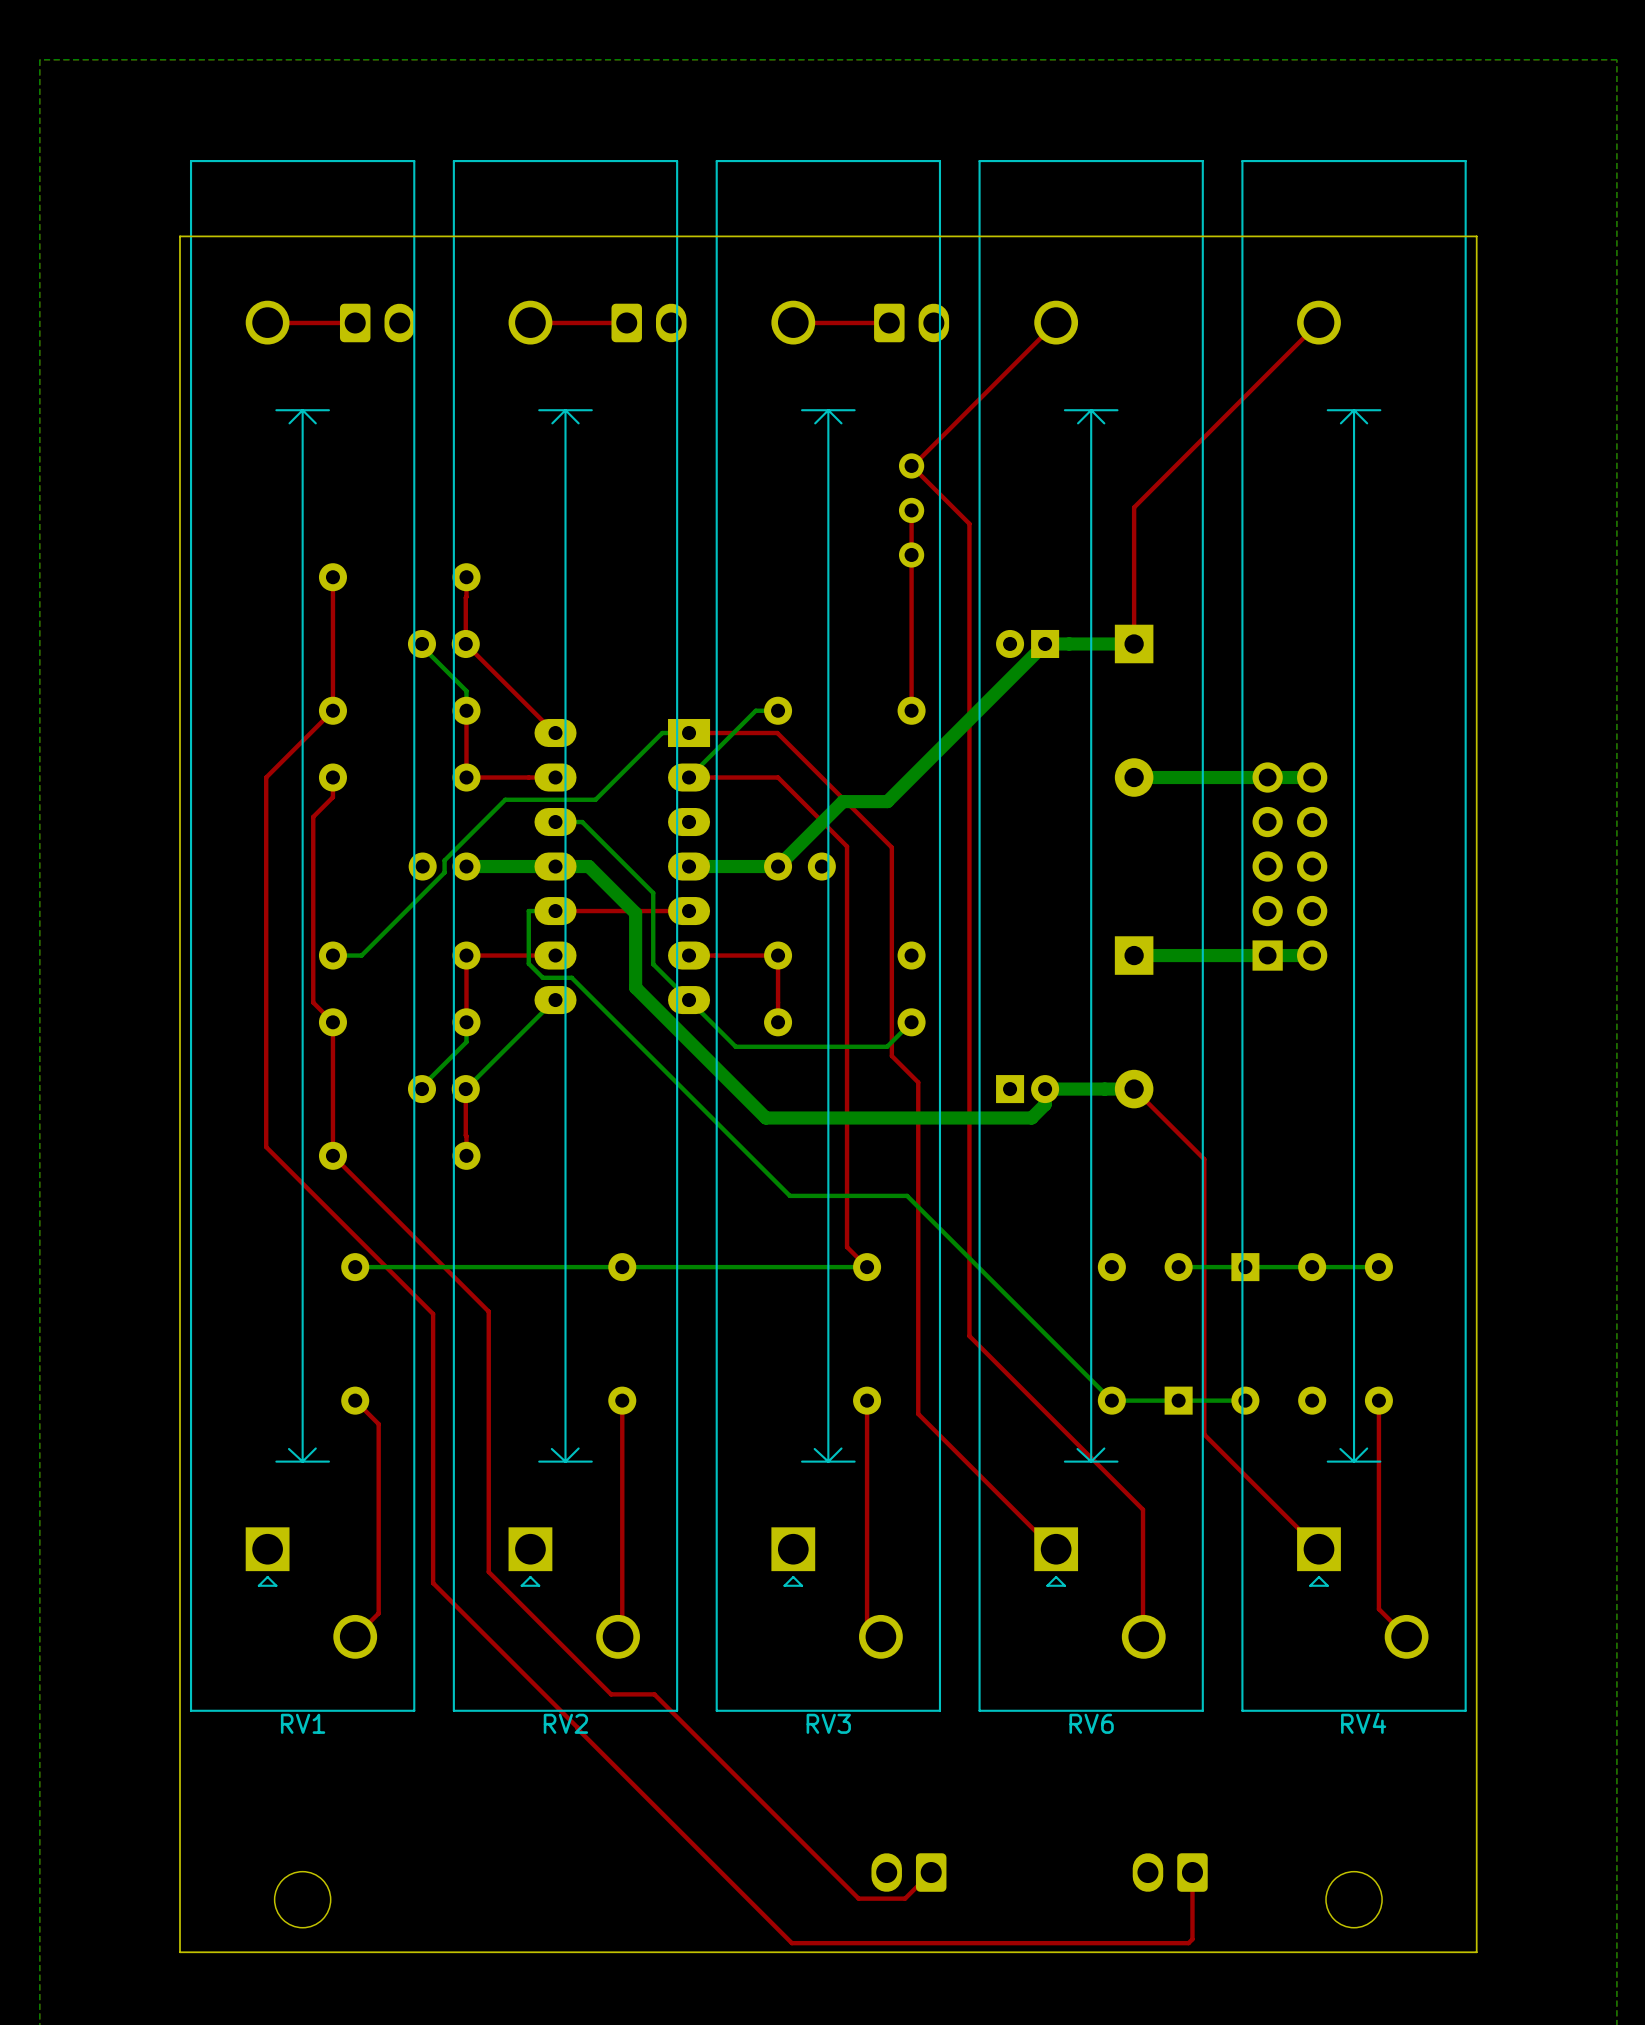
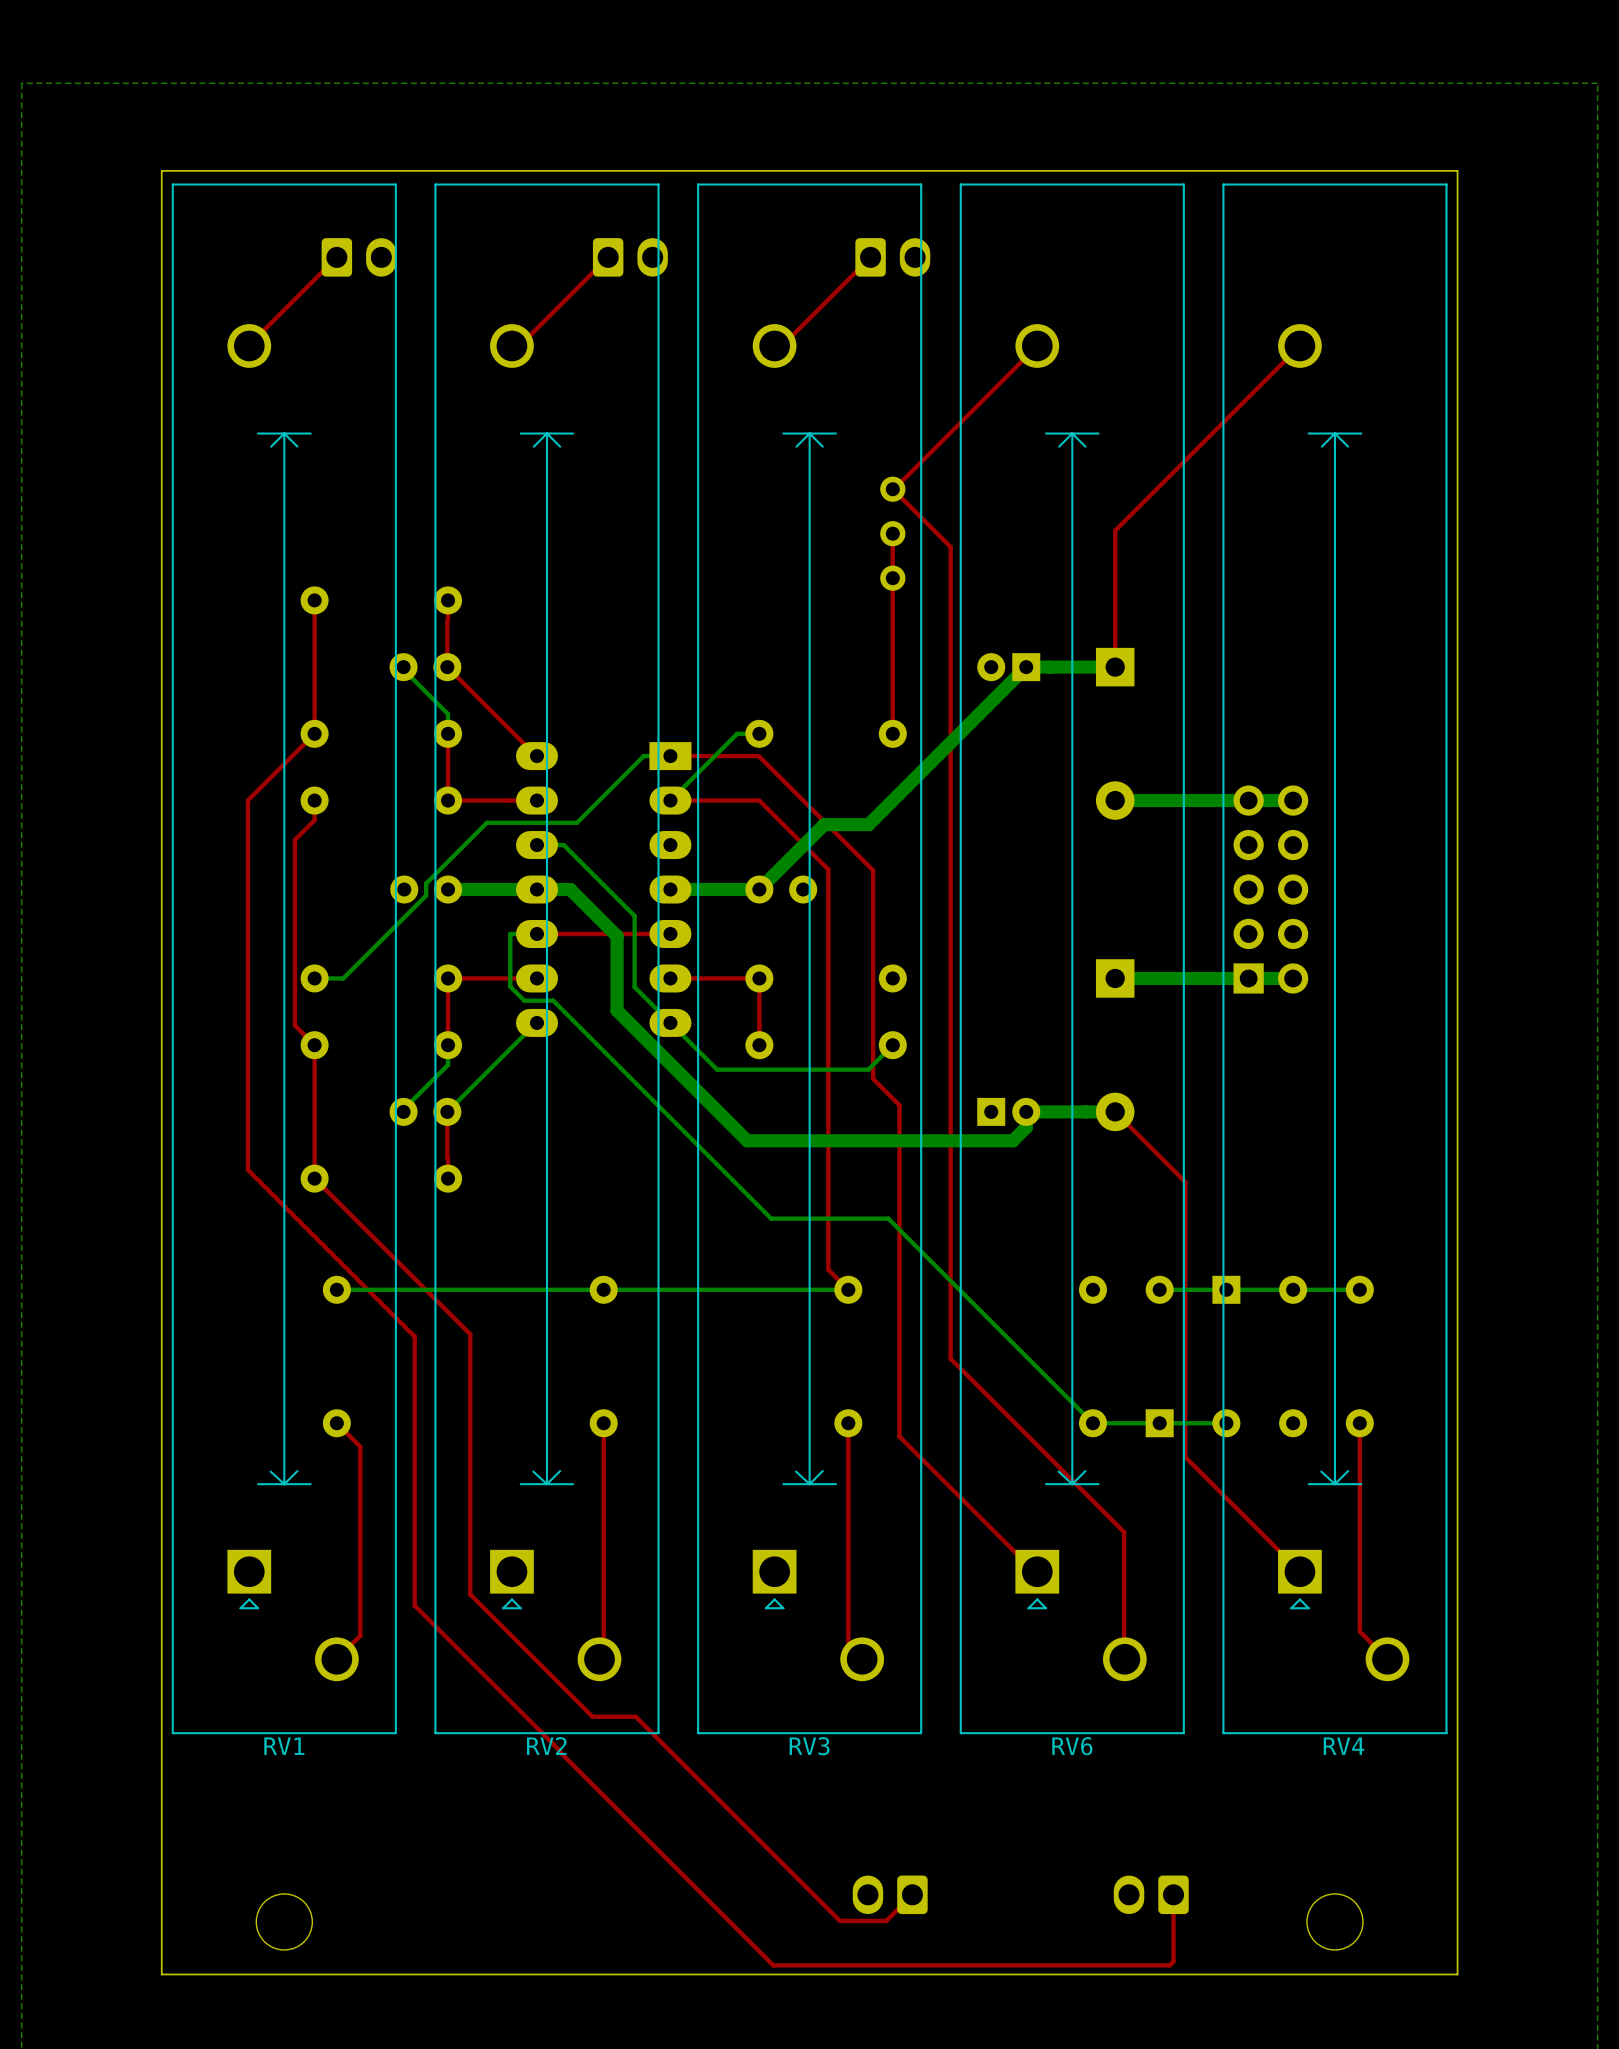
board edge: (1476, 236) (179, 236) -> (1457, 259) (1457, 170) (161, 170) (161, 259)
top track: (267, 322) (355, 322) -> (249, 345) (336, 257)
part position: (377, 322) -> (359, 257)
top track: (538, 322) (626, 322) -> (519, 345) (608, 257)
part position: (648, 322) -> (630, 257)
top track: (800, 322) (889, 322) -> (781, 345) (870, 257)
part position: (911, 322) -> (892, 257)

